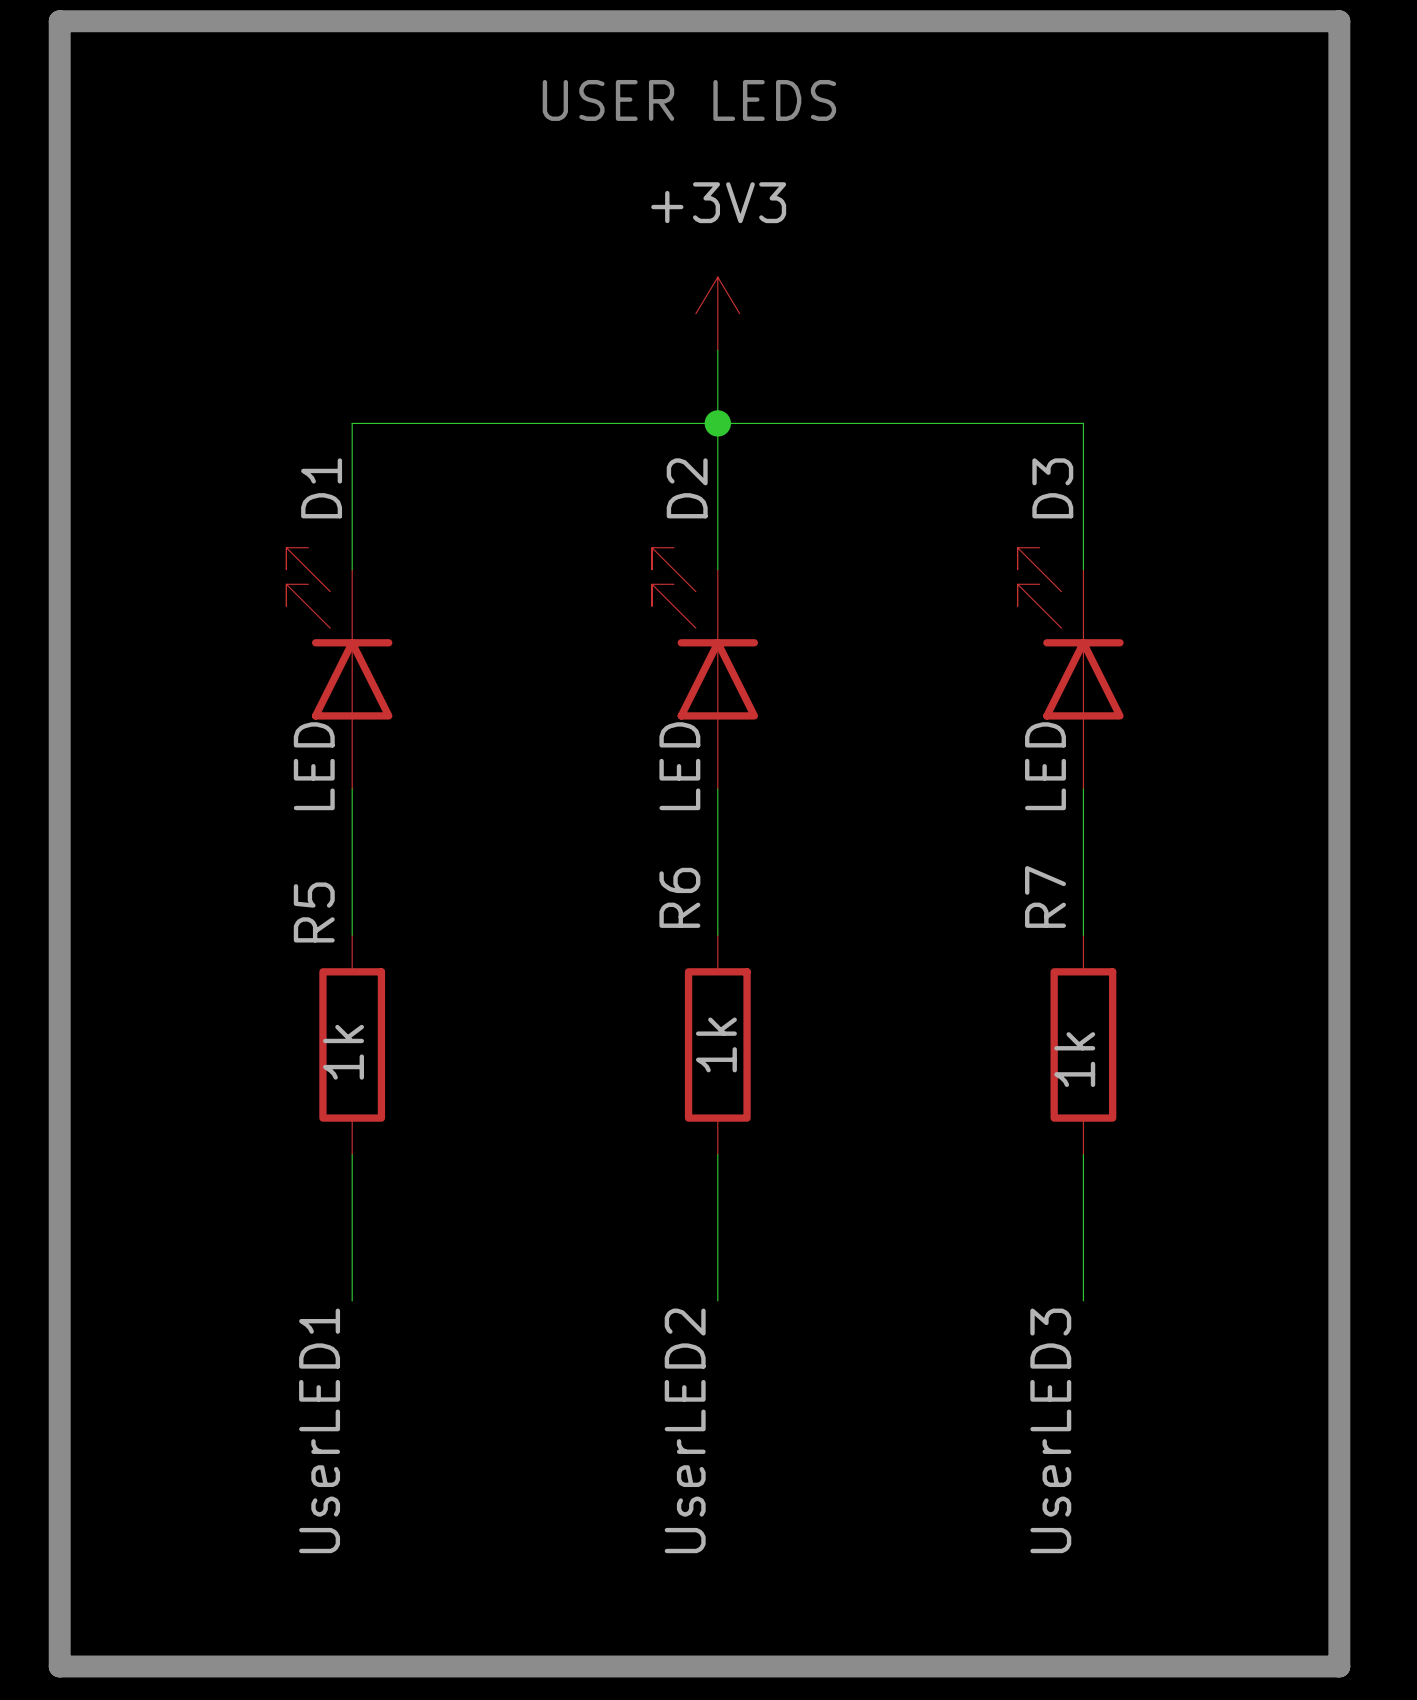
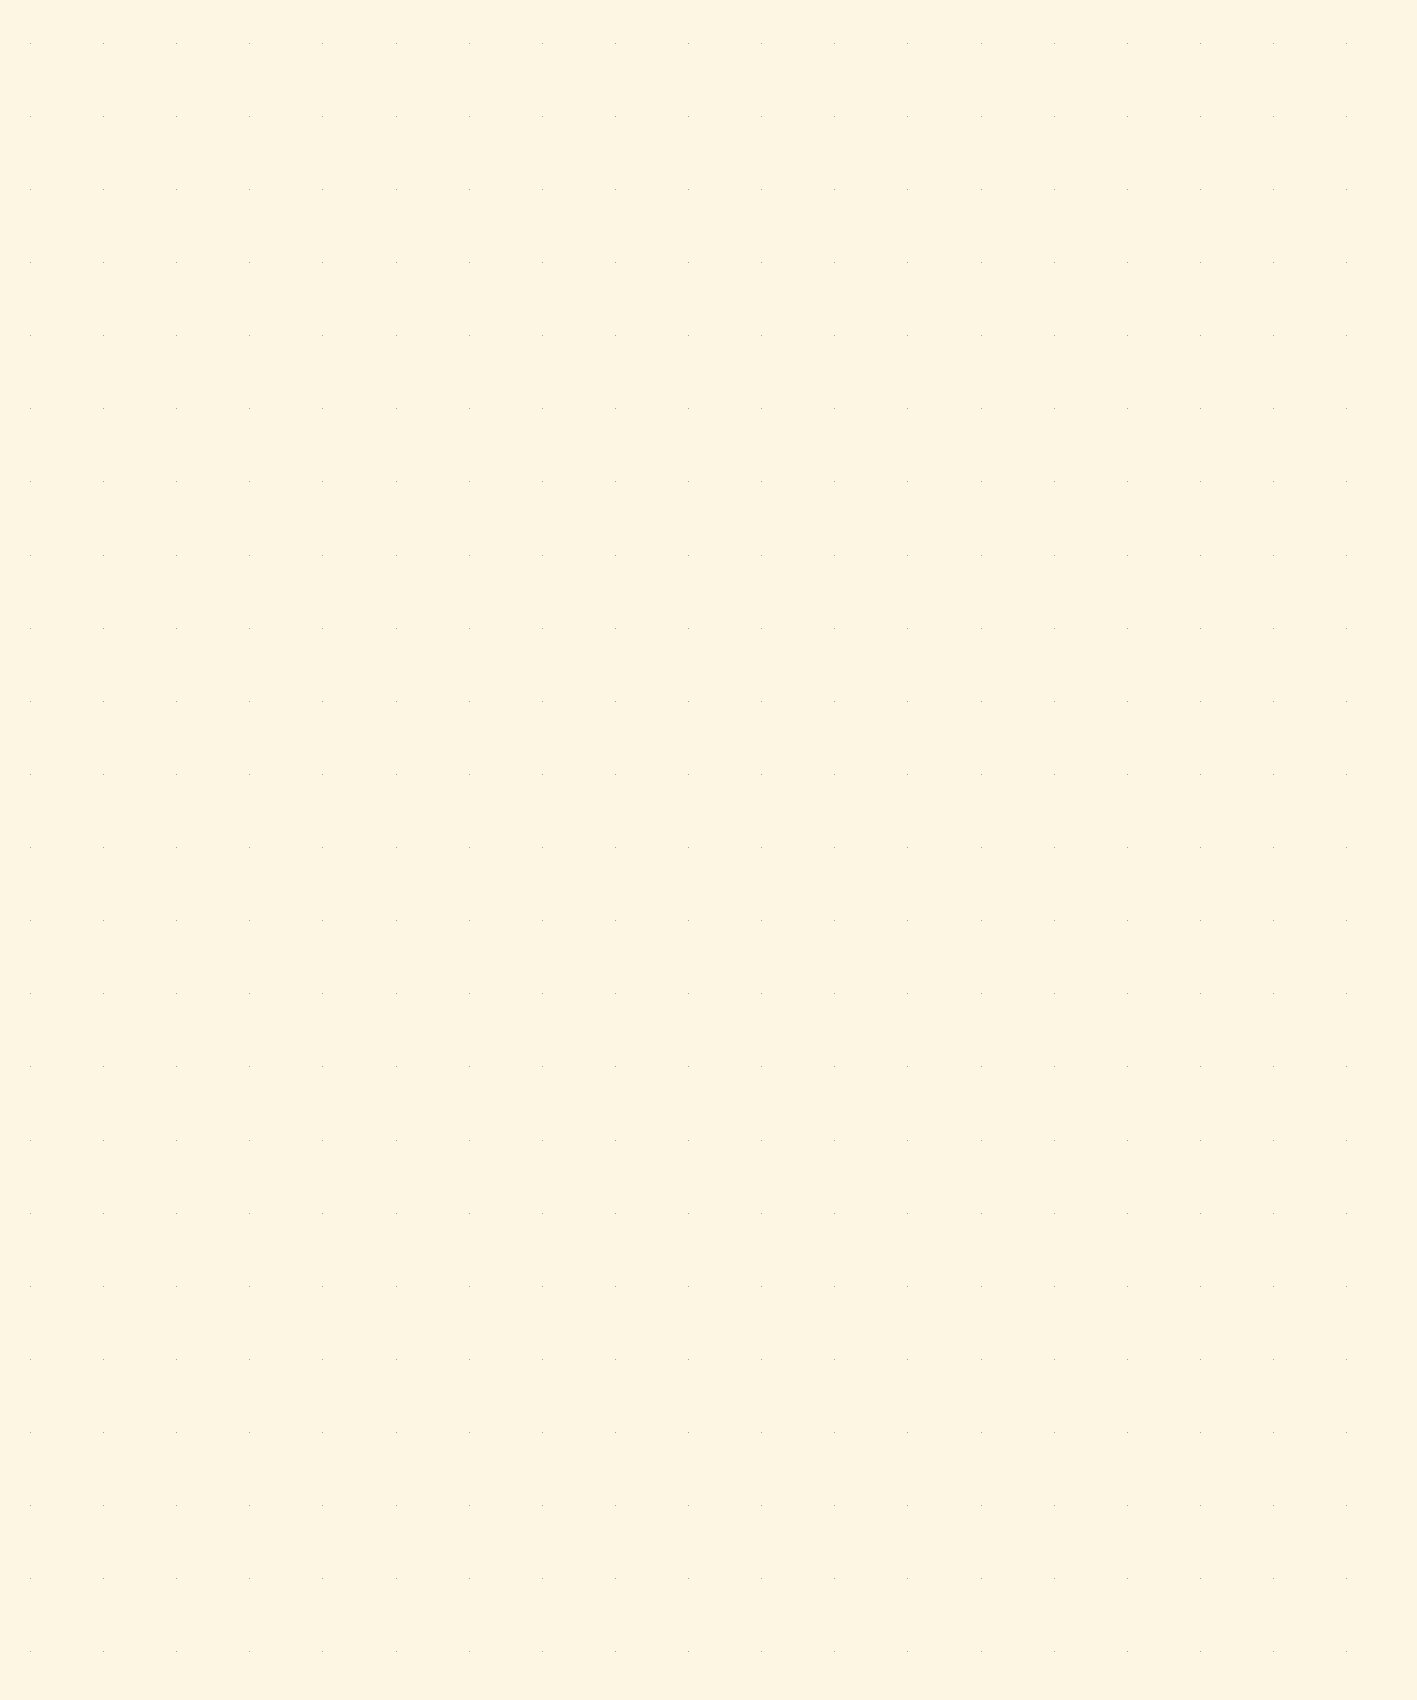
line: (59, 21) (1339, 21) (1339, 1666) (59, 1666) (59, 21) -> none
text: USER LEDS (689, 100) -> none
power symbol: +3V3 (717, 313) -> none
wire: (717, 350) (717, 569) -> none
junction: (717, 423) -> none
wire: (352, 569) (352, 423) (1083, 423) (1083, 569) -> none
D1: LED (339, 668) -> none
D2: LED (705, 668) -> none
D3: LED (1070, 668) -> none
wire: (352, 789) (352, 935) -> none
wire: (717, 789) (717, 935) -> none
wire: (1083, 789) (1083, 935) -> none
R5: 1k (352, 1044) -> none
R6: 1k (717, 1044) -> none
R7: 1k (1083, 1044) -> none
wire: (352, 1154) (352, 1300) -> none
wire: (717, 1154) (717, 1300) -> none
wire: (1083, 1154) (1083, 1300) -> none
label: UserLED1 (319, 1430) -> none
label: UserLED2 (685, 1430) -> none
label: UserLED3 (1050, 1430) -> none

